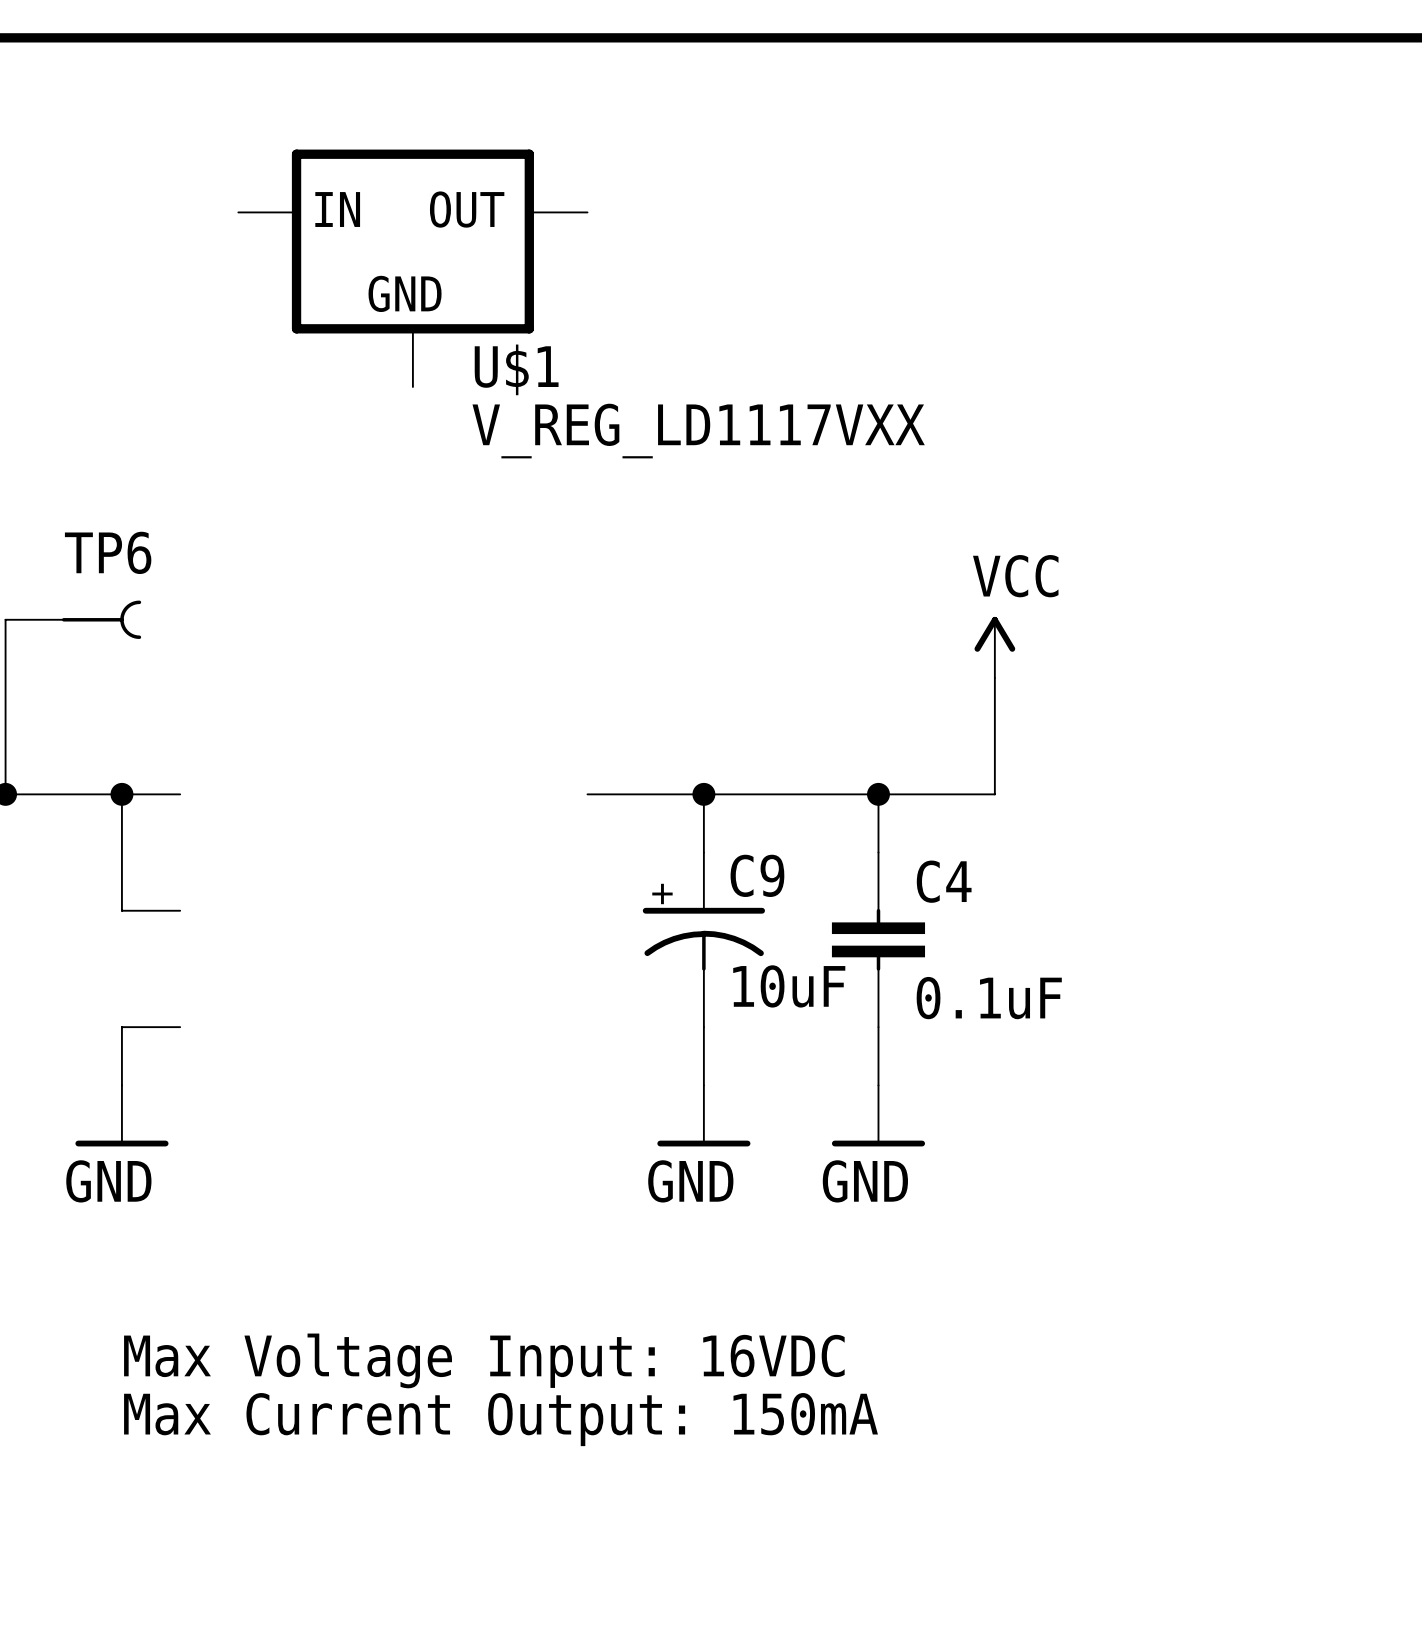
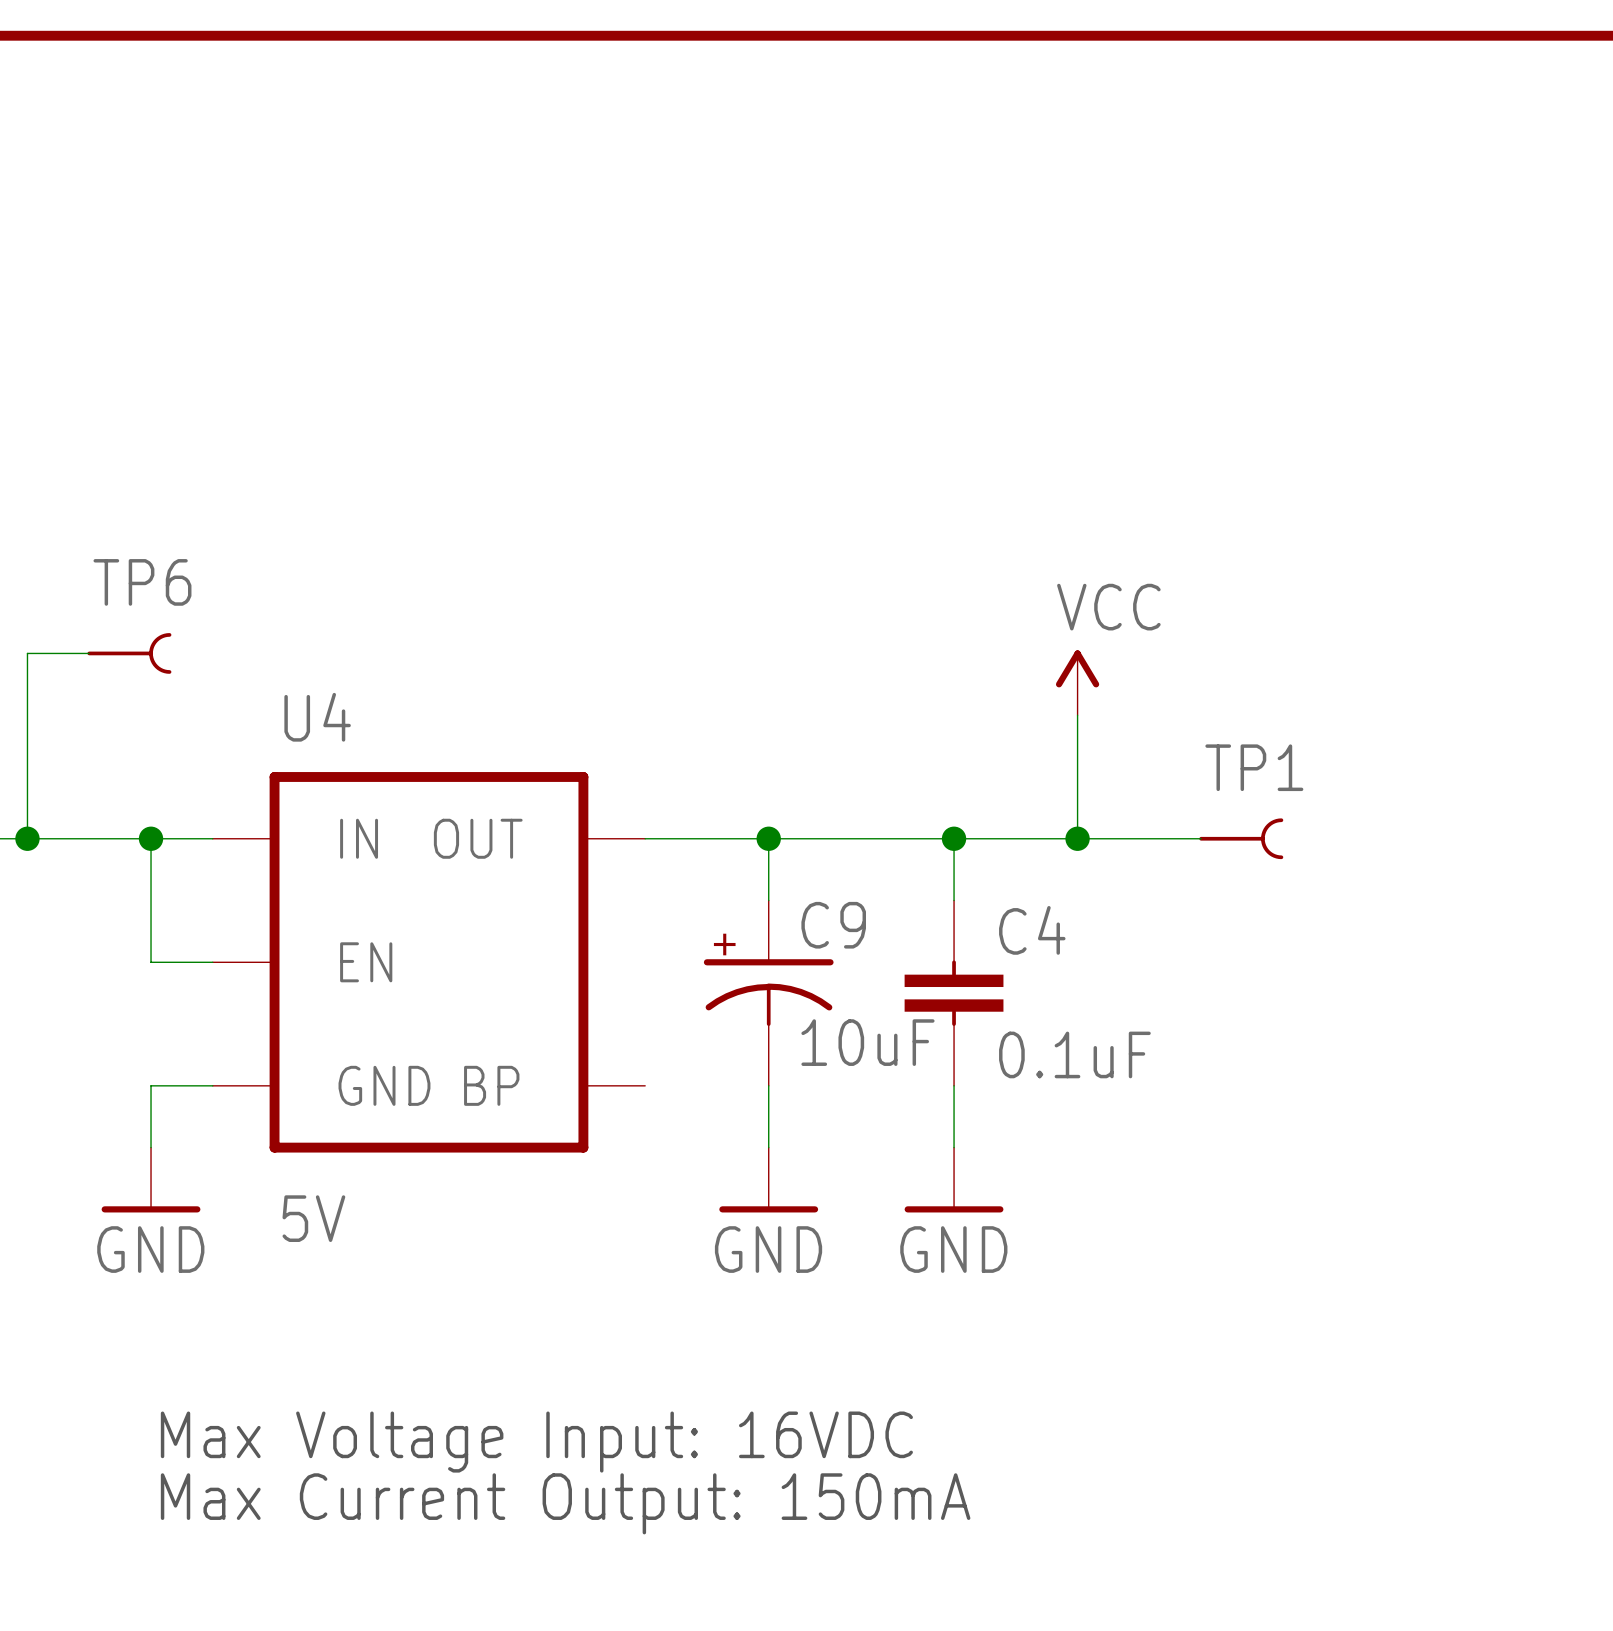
U$1: V_REG_LD1117VXX (412, 268) -> none
wire: none -> (1077, 838) (1201, 838)
junction: none -> (1077, 838)
TP1: none -> (1241, 838)
U4: none -> 5V (428, 962)

